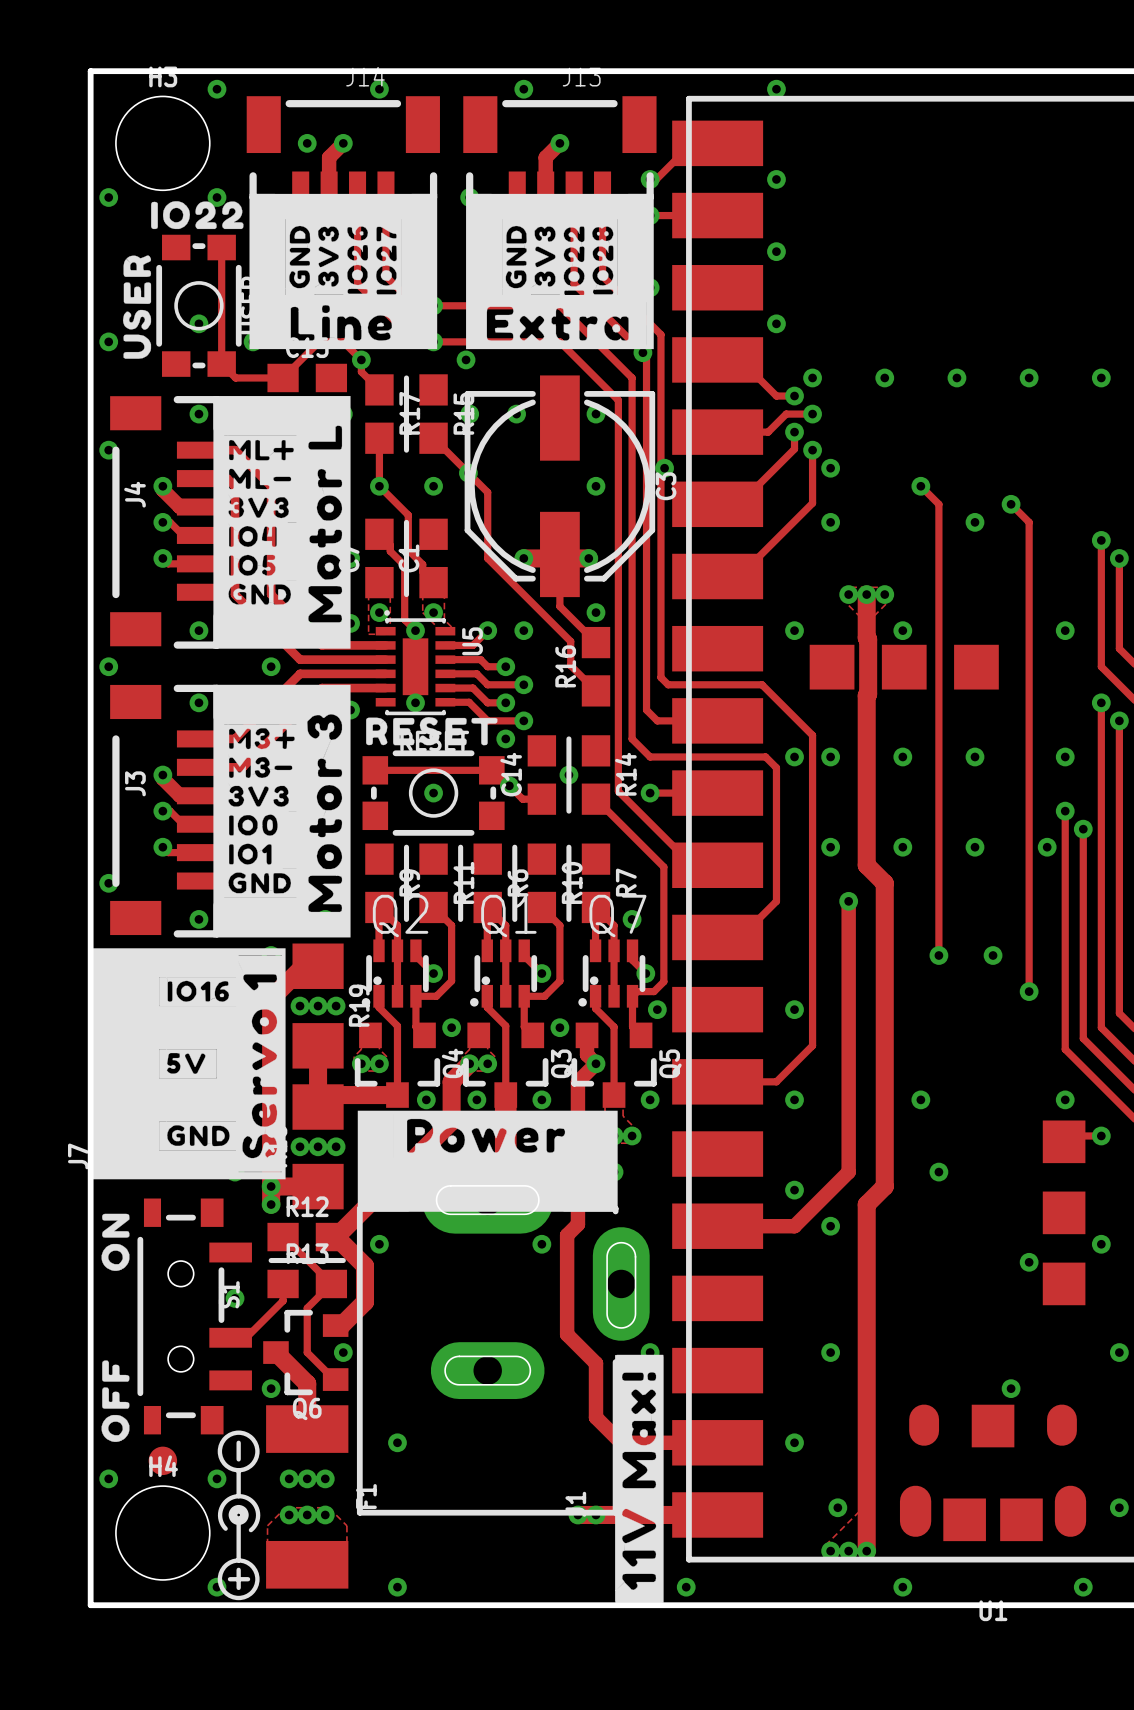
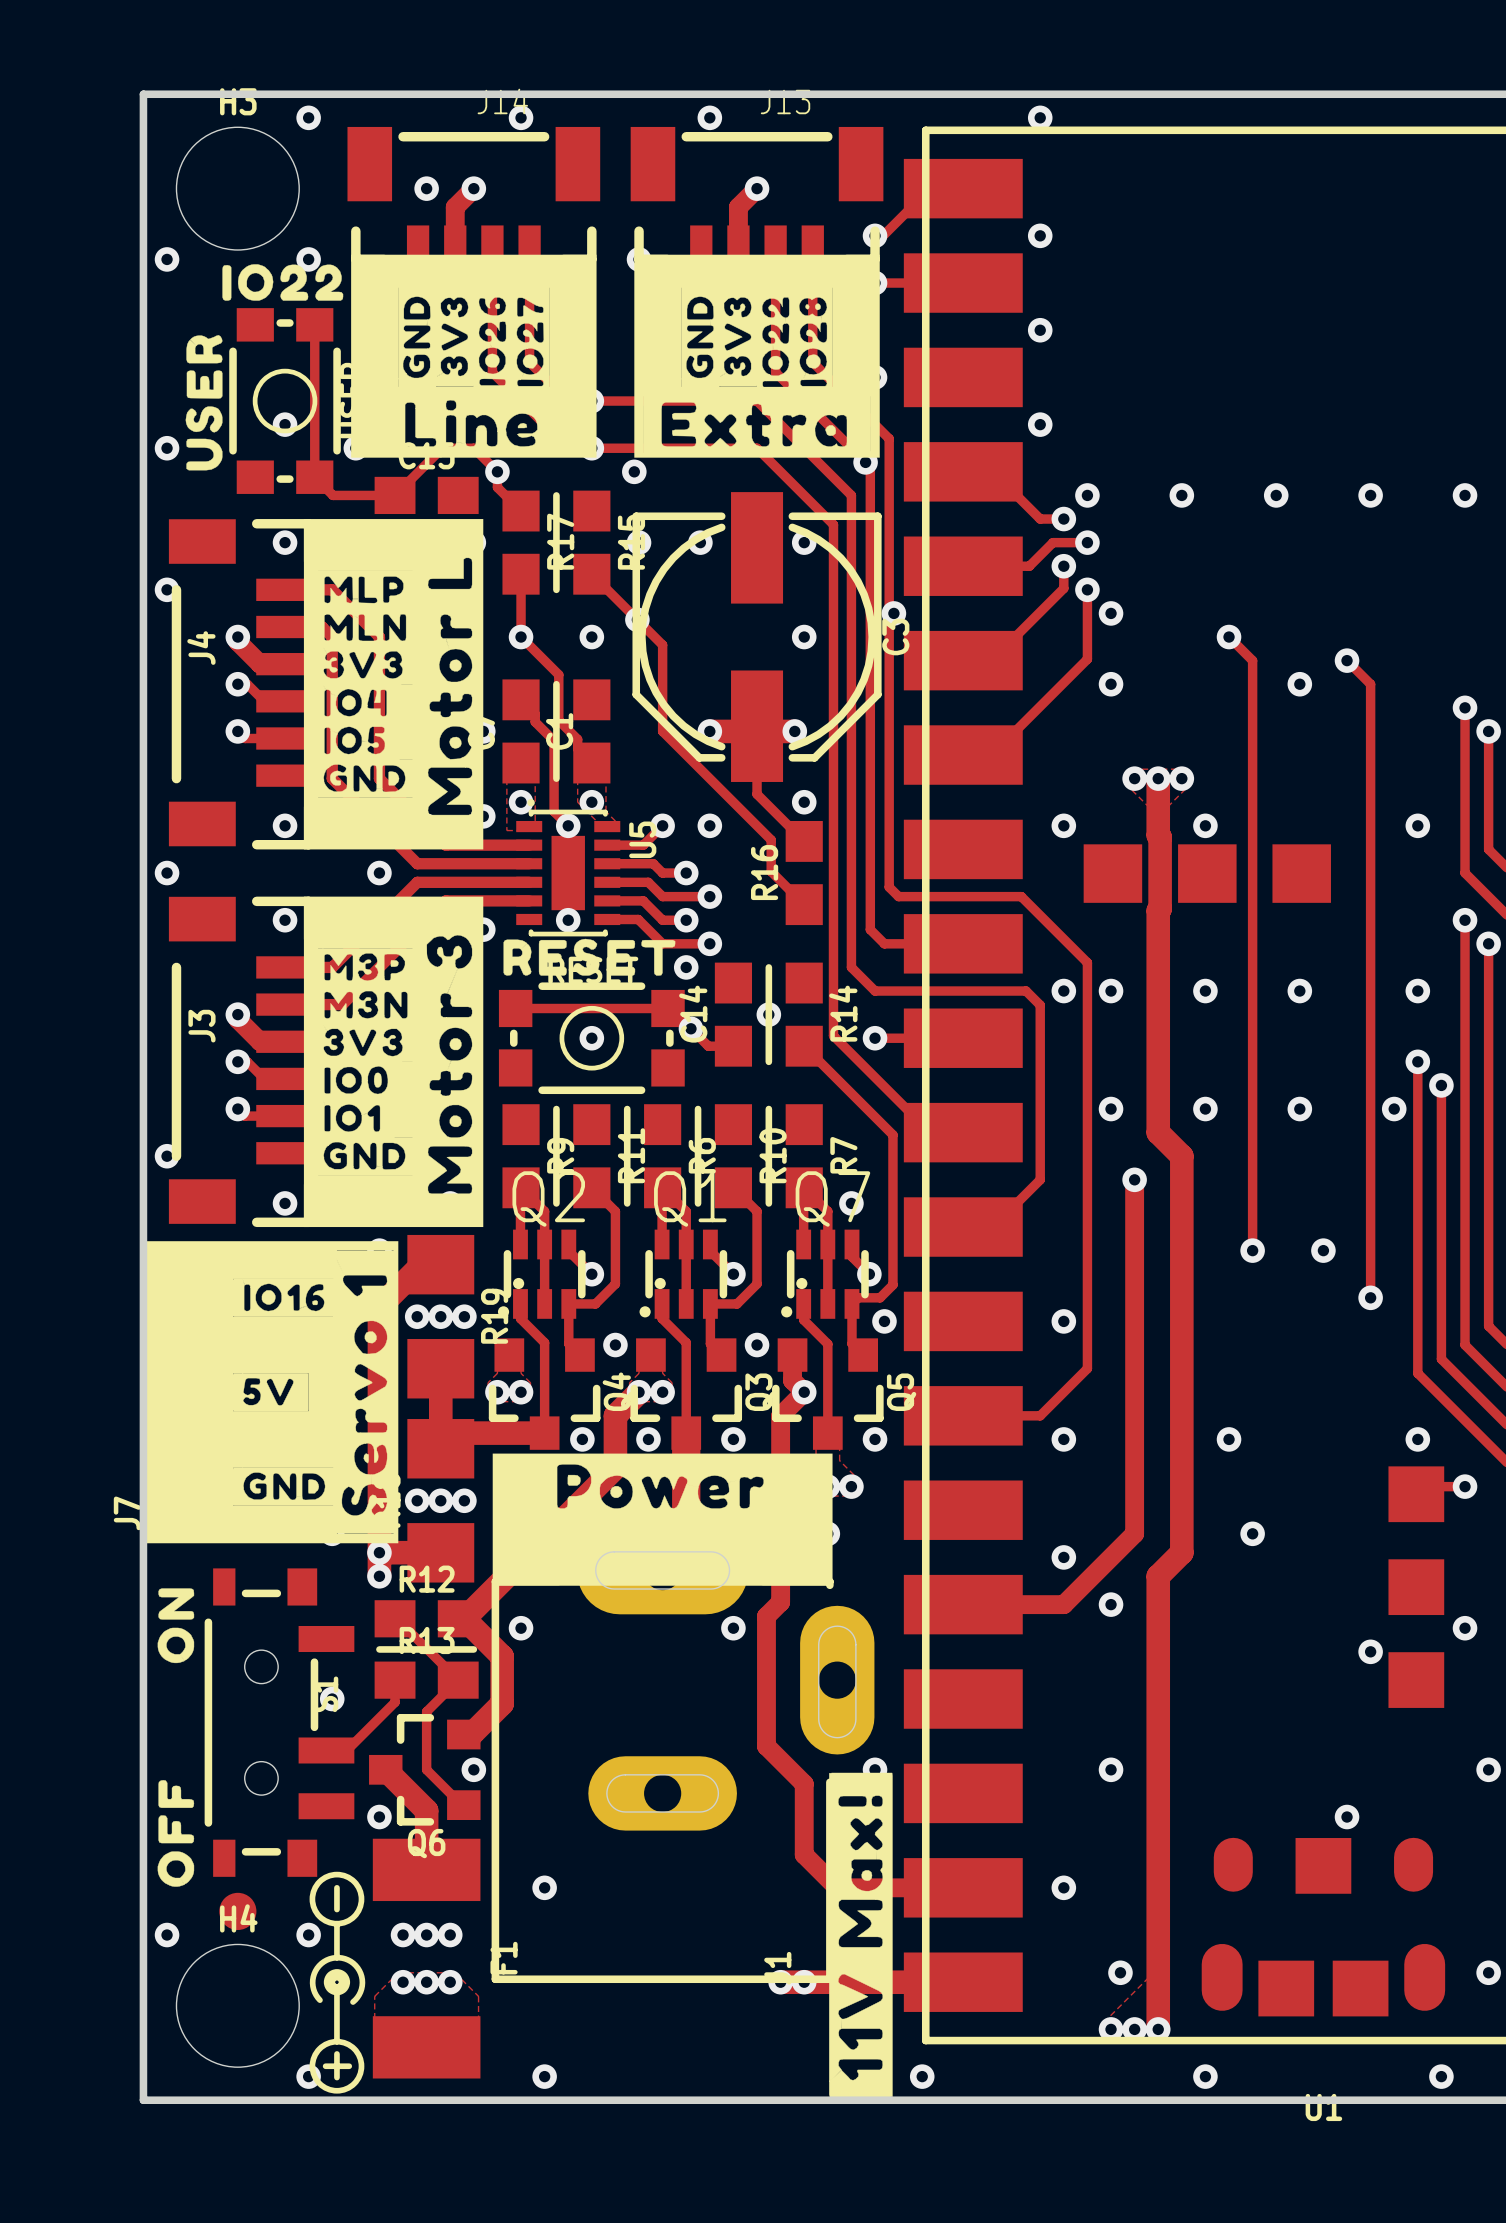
drawing shape: [220, 435, 302, 465] -> [313, 570, 418, 609]
drawing shape: [220, 464, 299, 494] -> [313, 608, 421, 647]
drawing shape: [220, 724, 303, 754] -> [313, 948, 419, 987]
drawing shape: [220, 753, 300, 783] -> [313, 986, 422, 1025]

